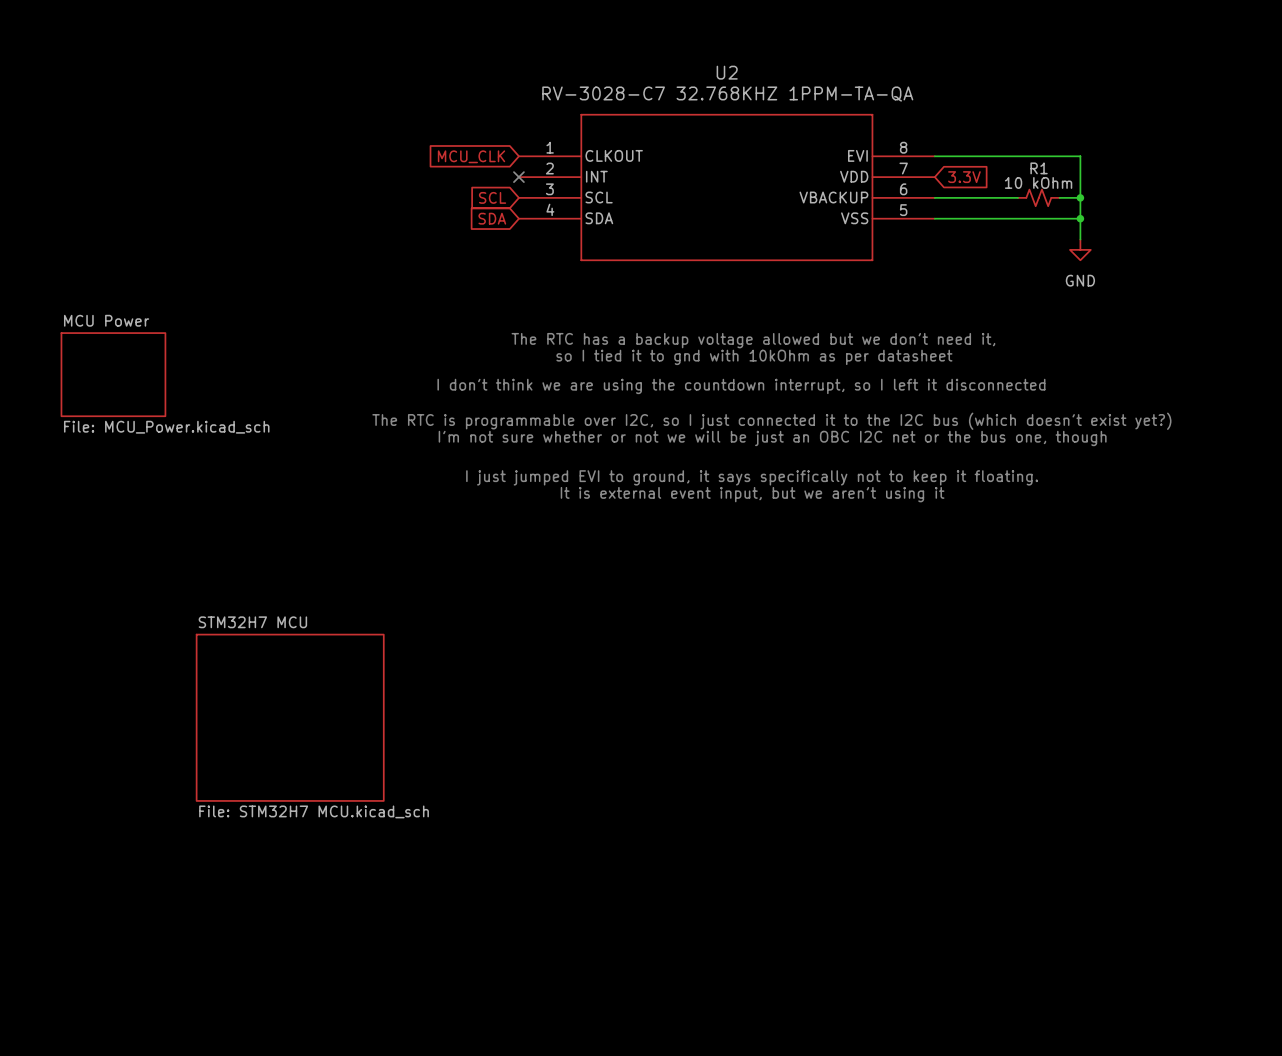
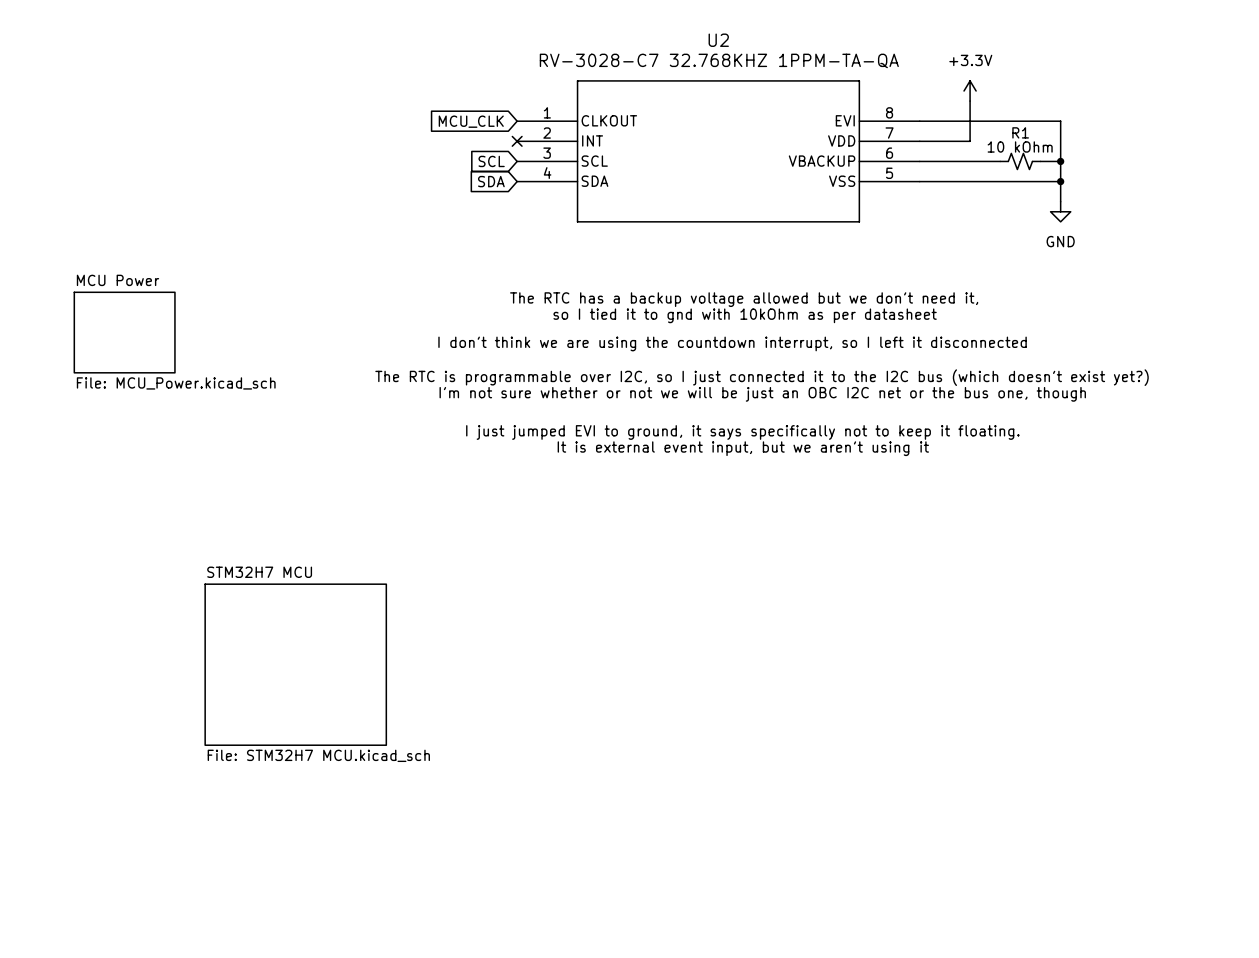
power symbol: none -> +3.3V (970, 91)
wire: none -> (970, 101) (970, 141) (919, 141)
global label: 3.3V (964, 177) -> none

